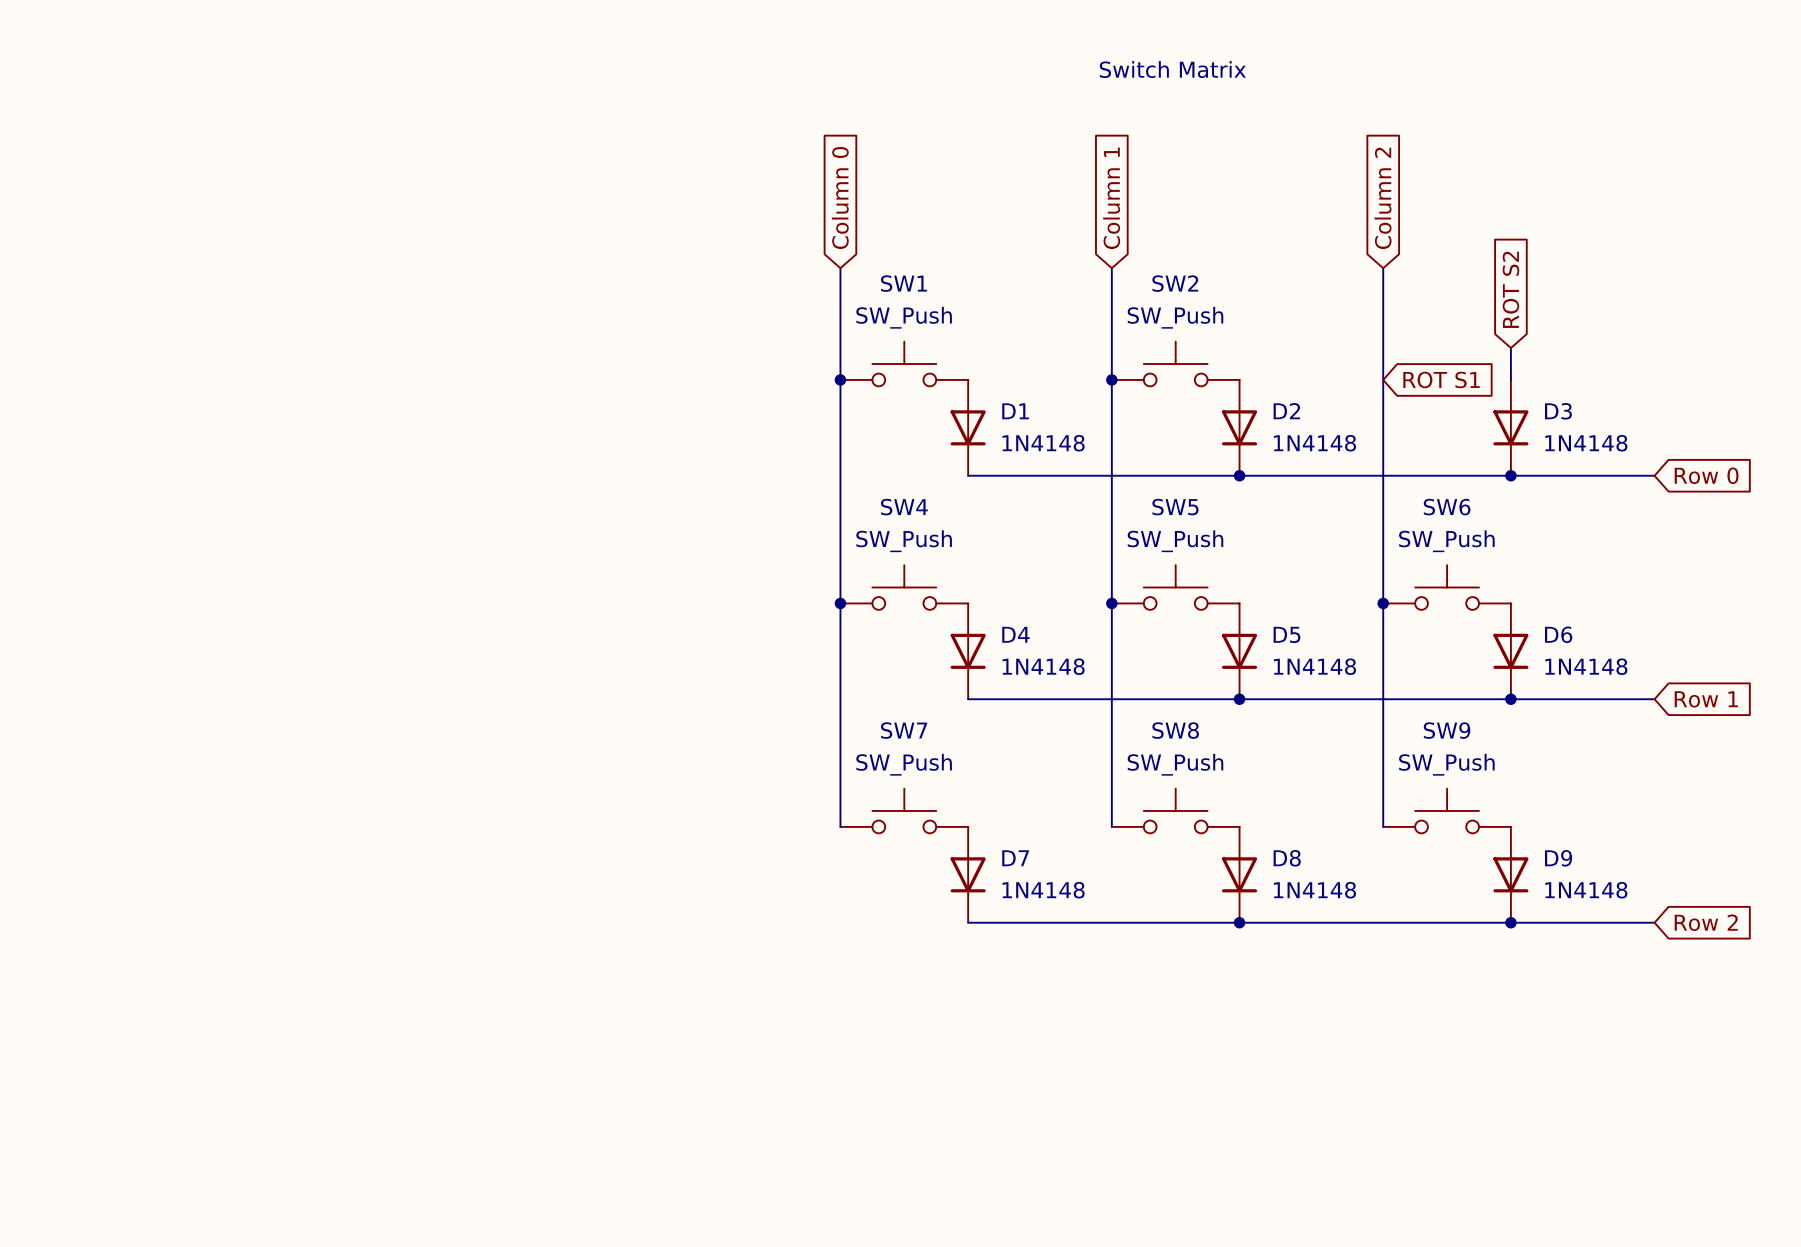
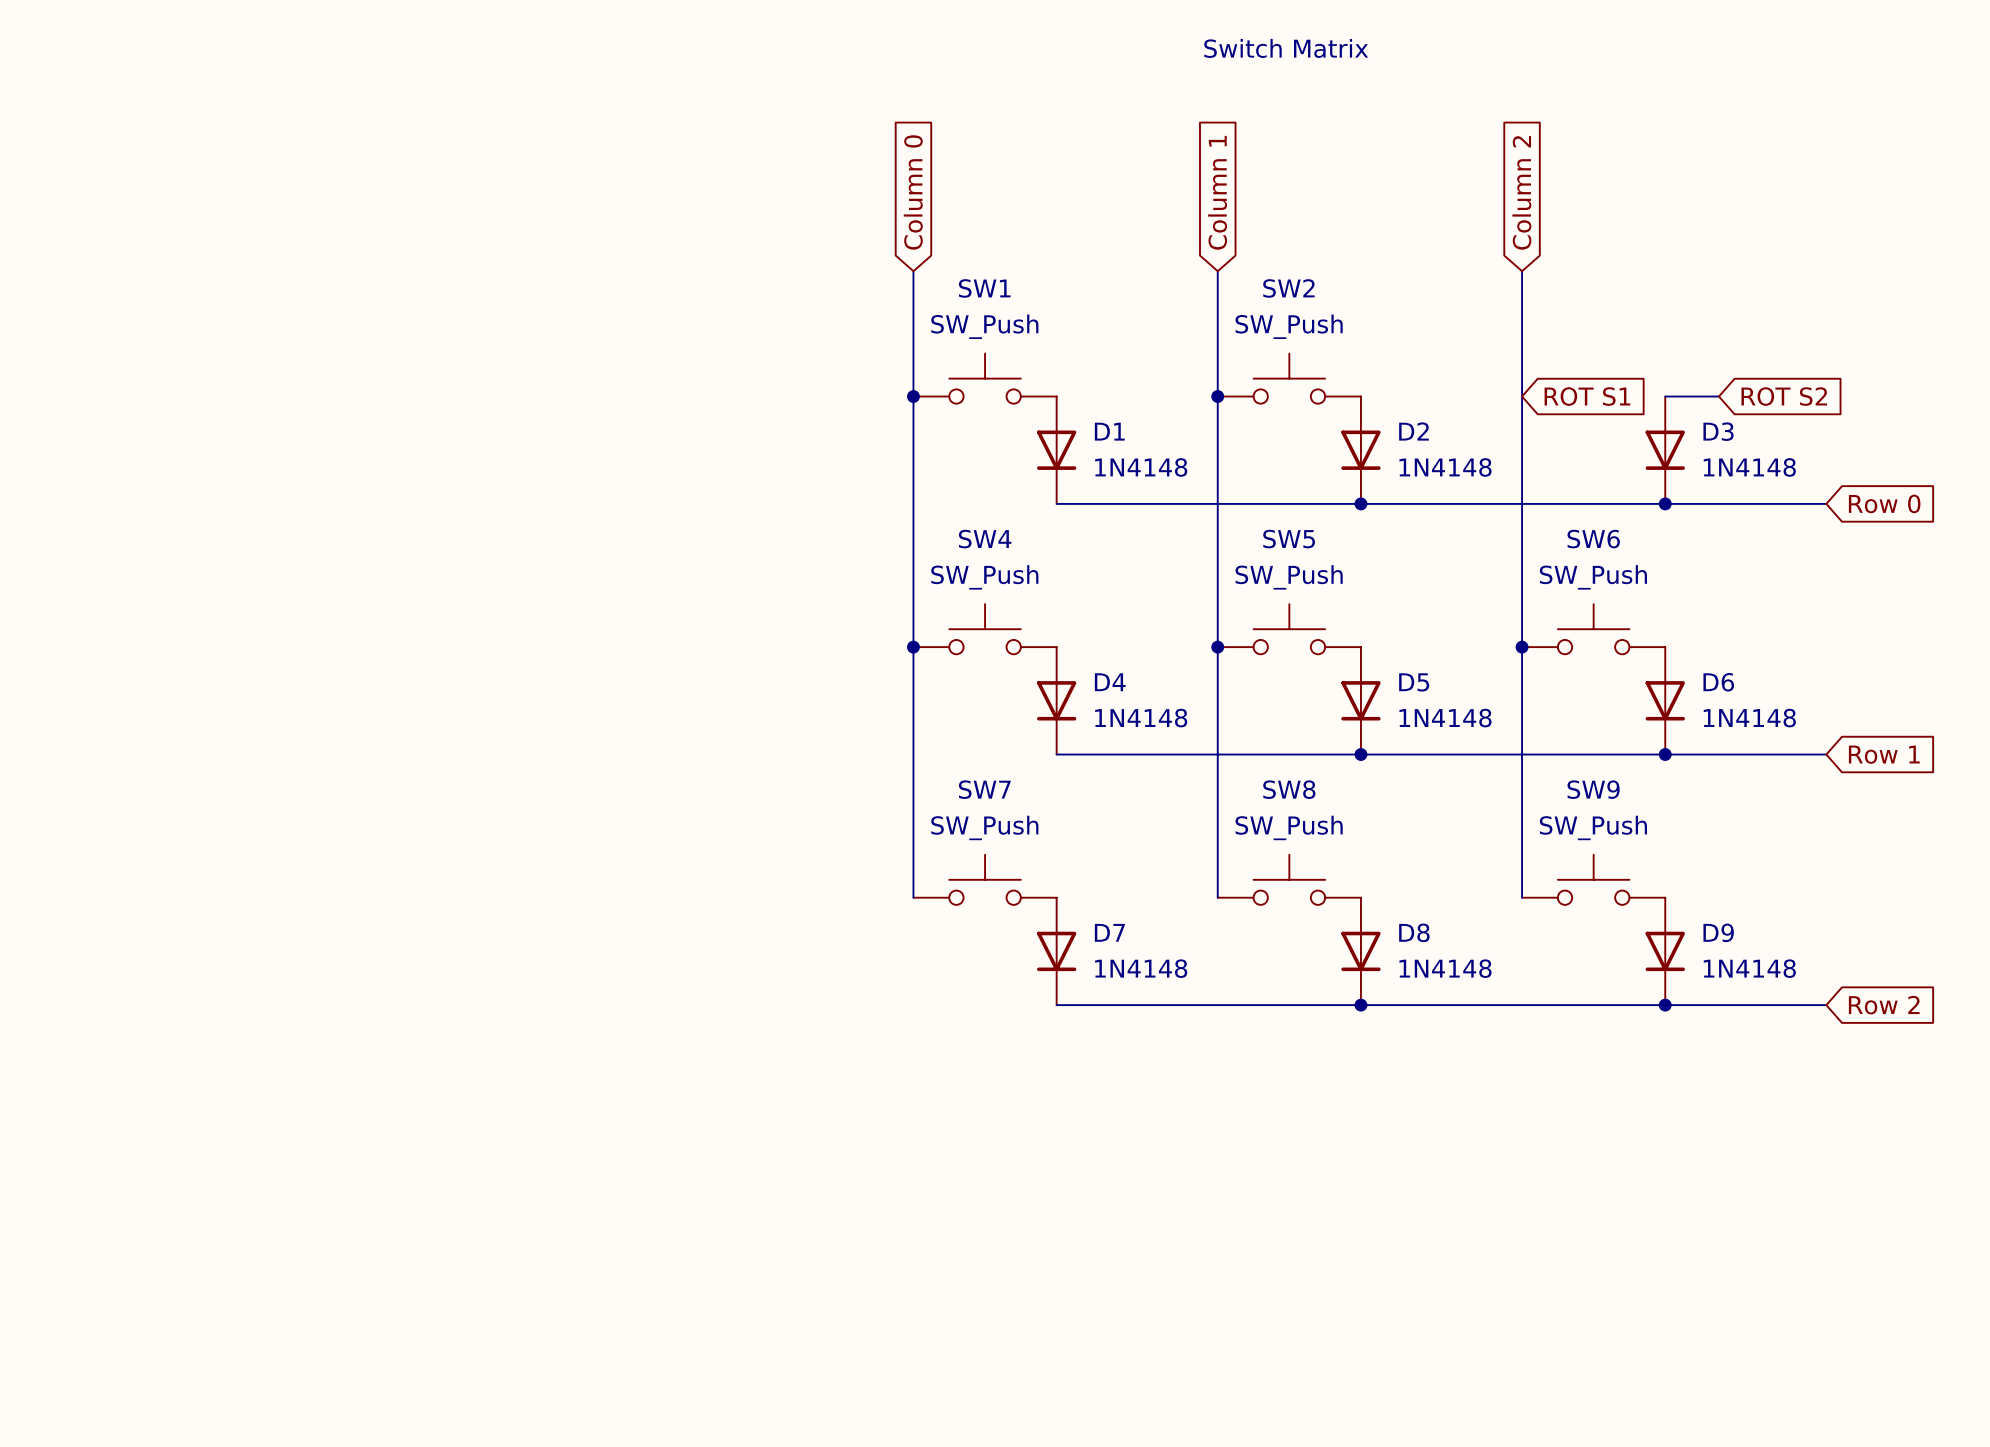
global label rotation: 0° (1510, 289) -> 90° clockwise (1784, 396)
global label position: ROT S2 (1510, 289) -> ROT S2 (1784, 396)
wire: (1510, 348) (1510, 379) -> (1718, 396) (1665, 396)

